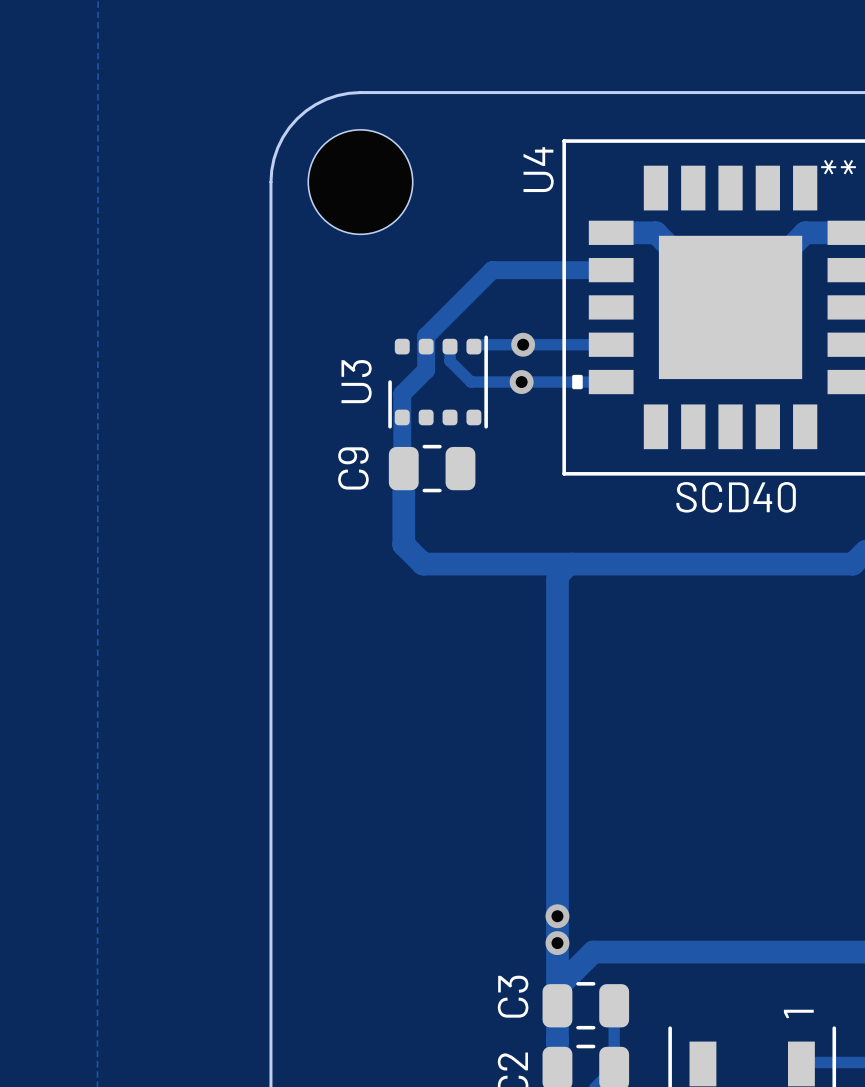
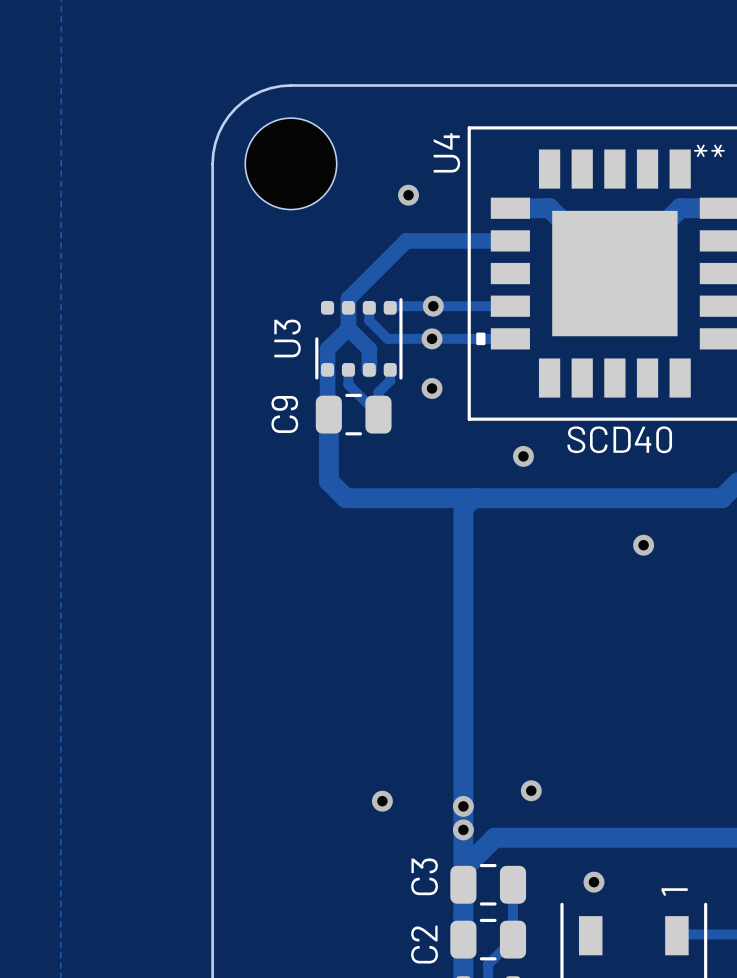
via: none -> (408, 195)
track: none -> (348, 328) (369, 349) (369, 369)
track: none -> (348, 369) (348, 384) (378, 414) (378, 392) (390, 380) (390, 369)
via: none -> (432, 388)
via: none -> (523, 456)
via: none -> (643, 545)
via: none -> (531, 790)
via: none -> (382, 801)
via: none -> (593, 882)

